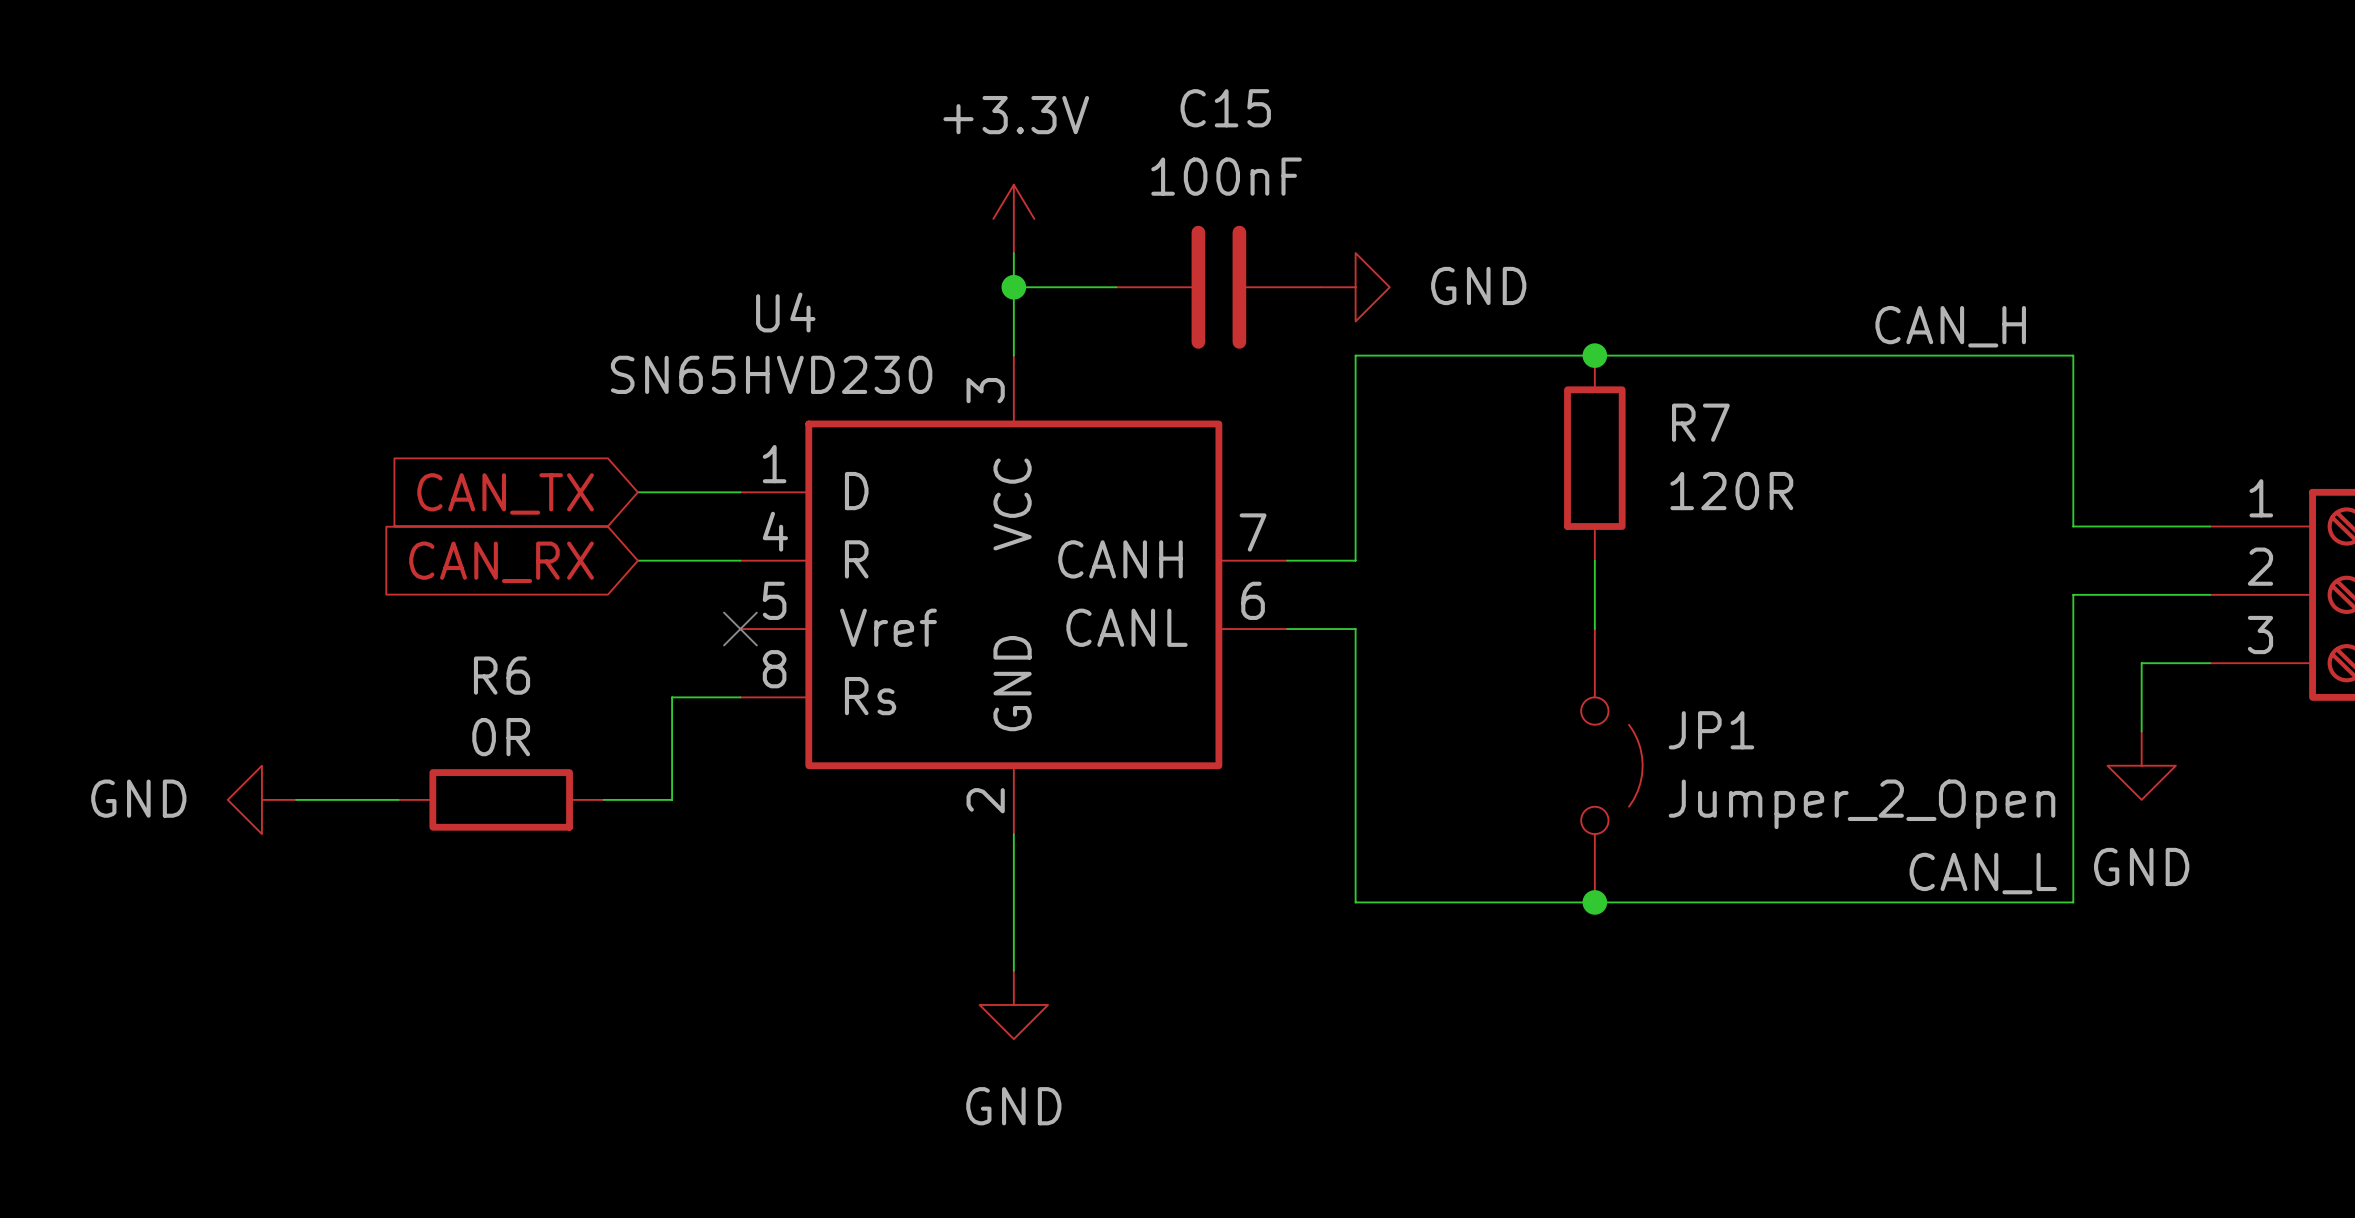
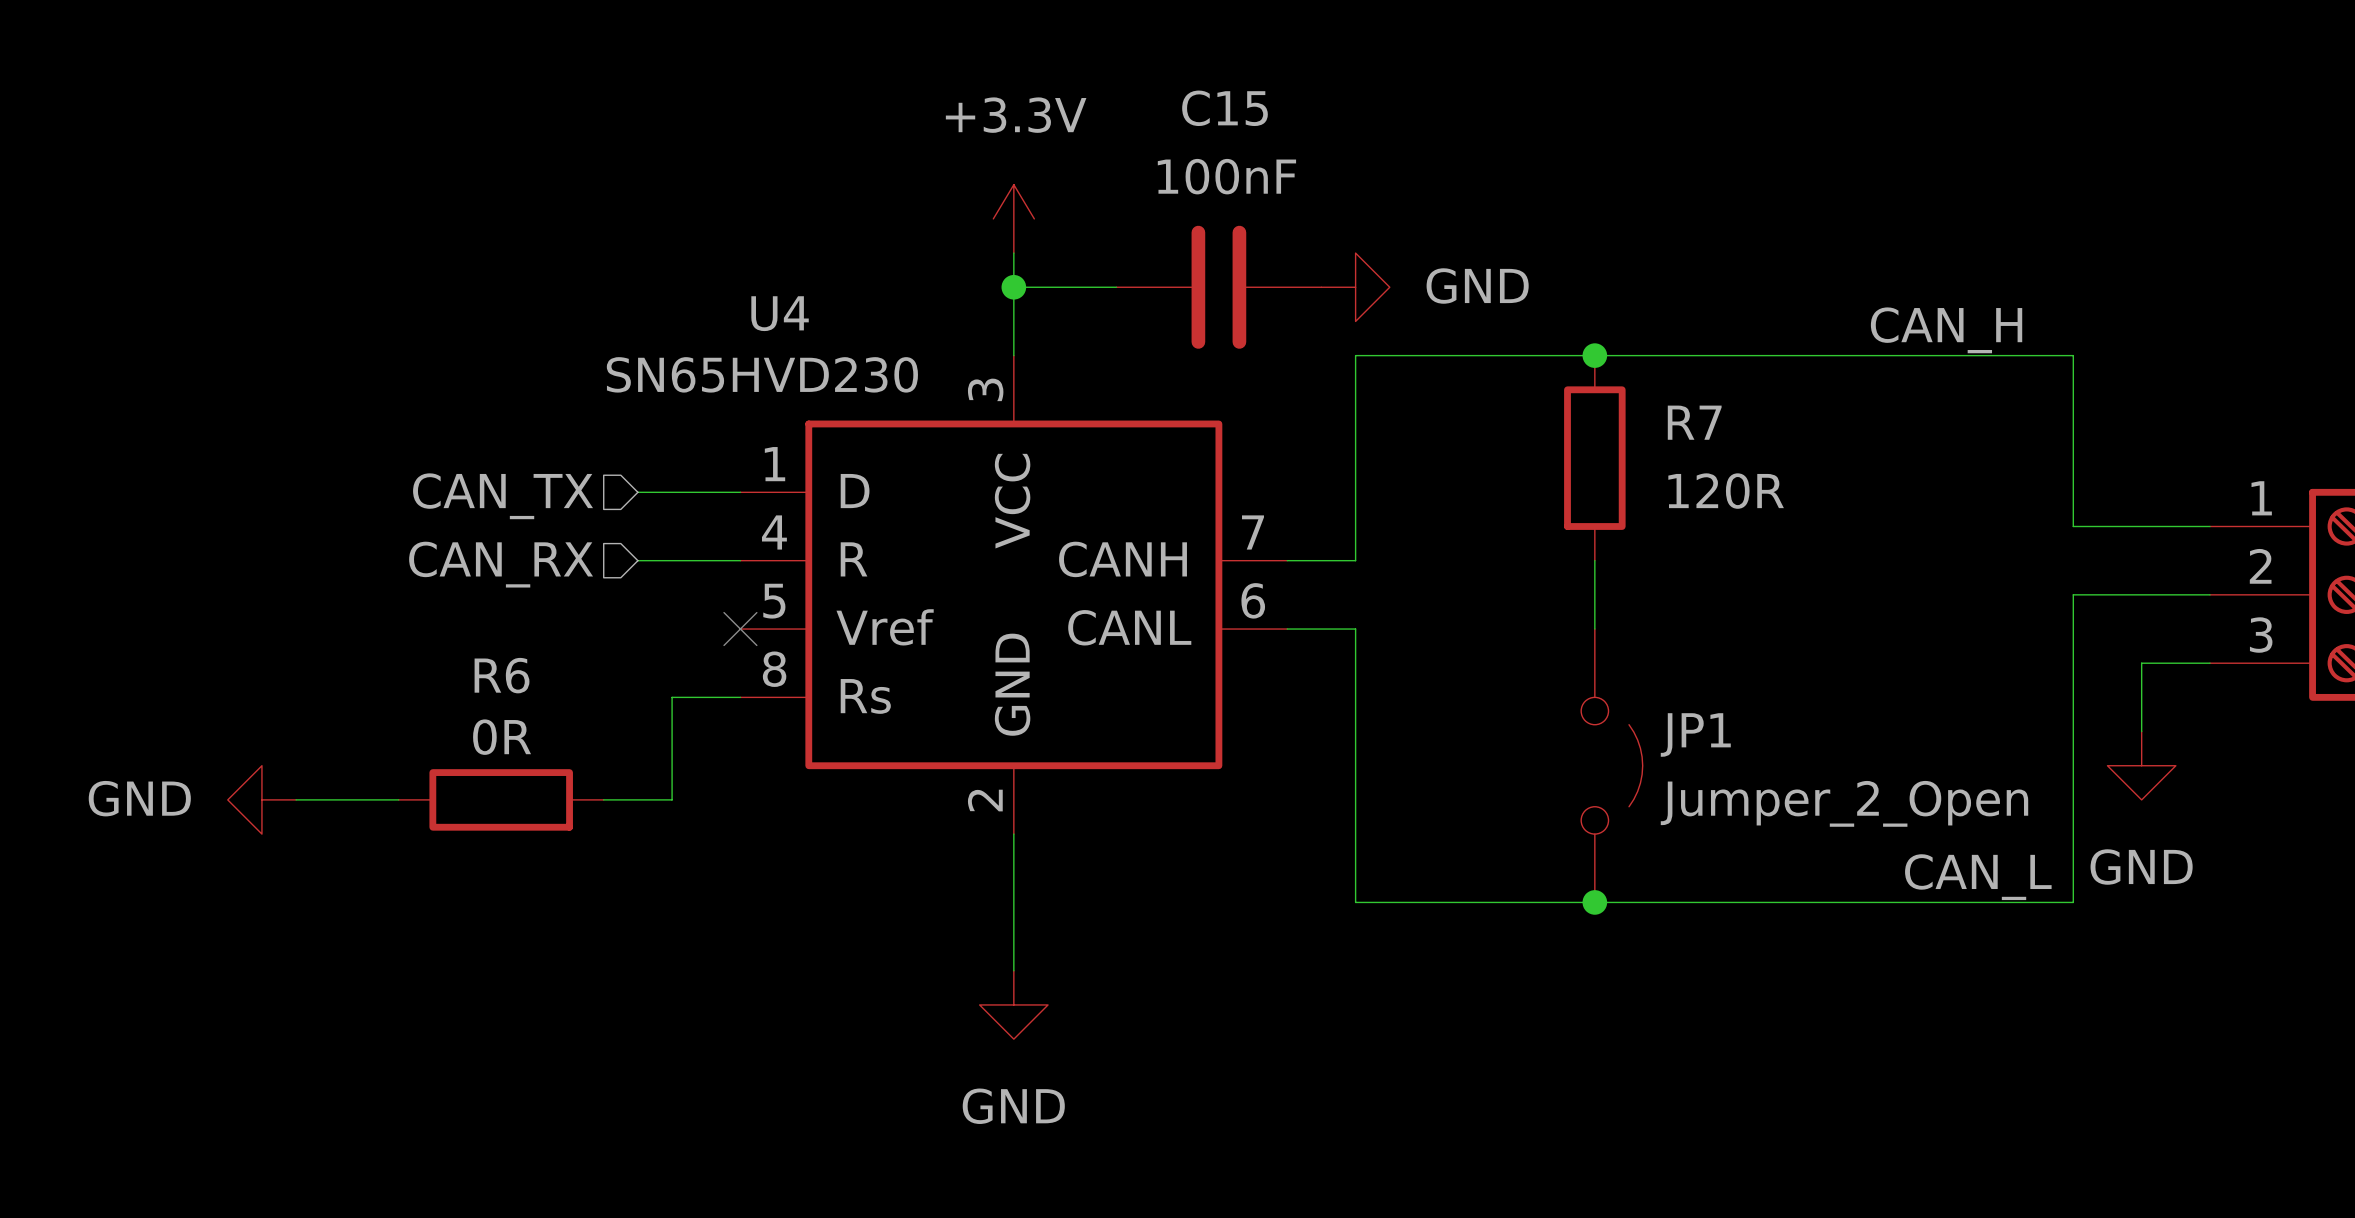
hierarchical label: none -> CAN_TX (503, 496)
global label: CAN_TX (505, 493) -> none
hierarchical label: none -> CAN_RX (501, 564)
global label: CAN_RX (501, 562) -> none

